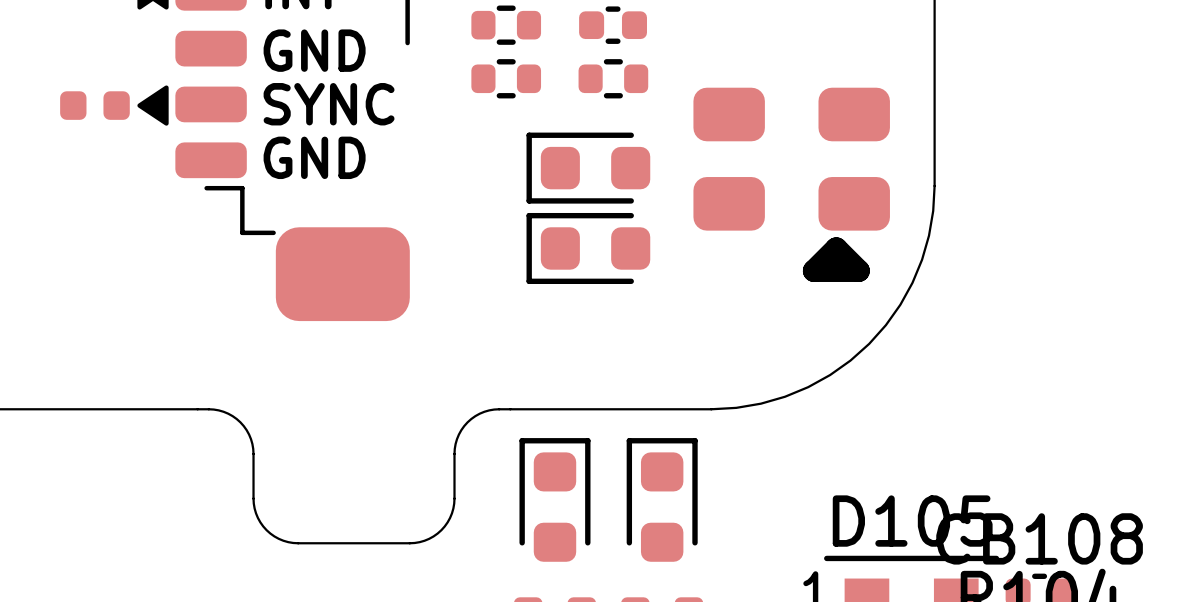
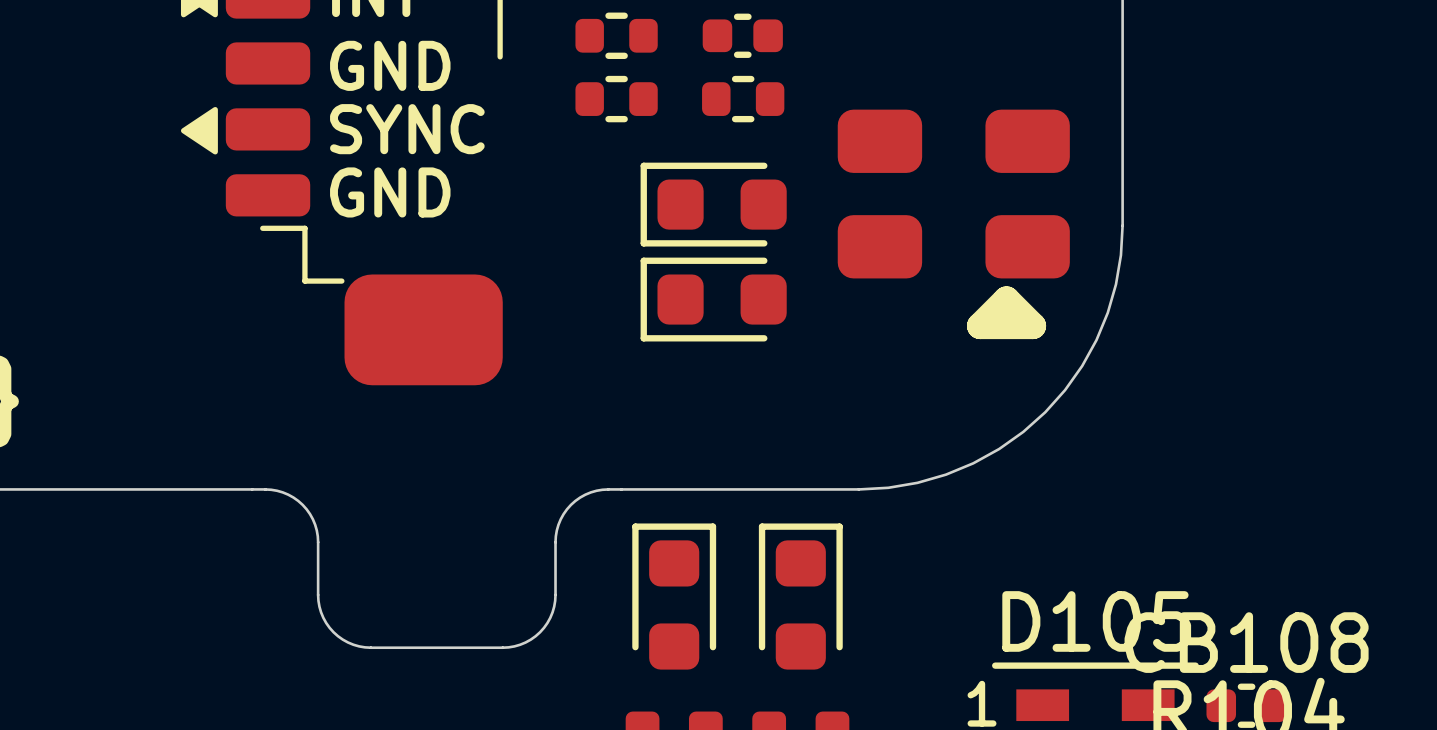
part: (94, 105) -> none

